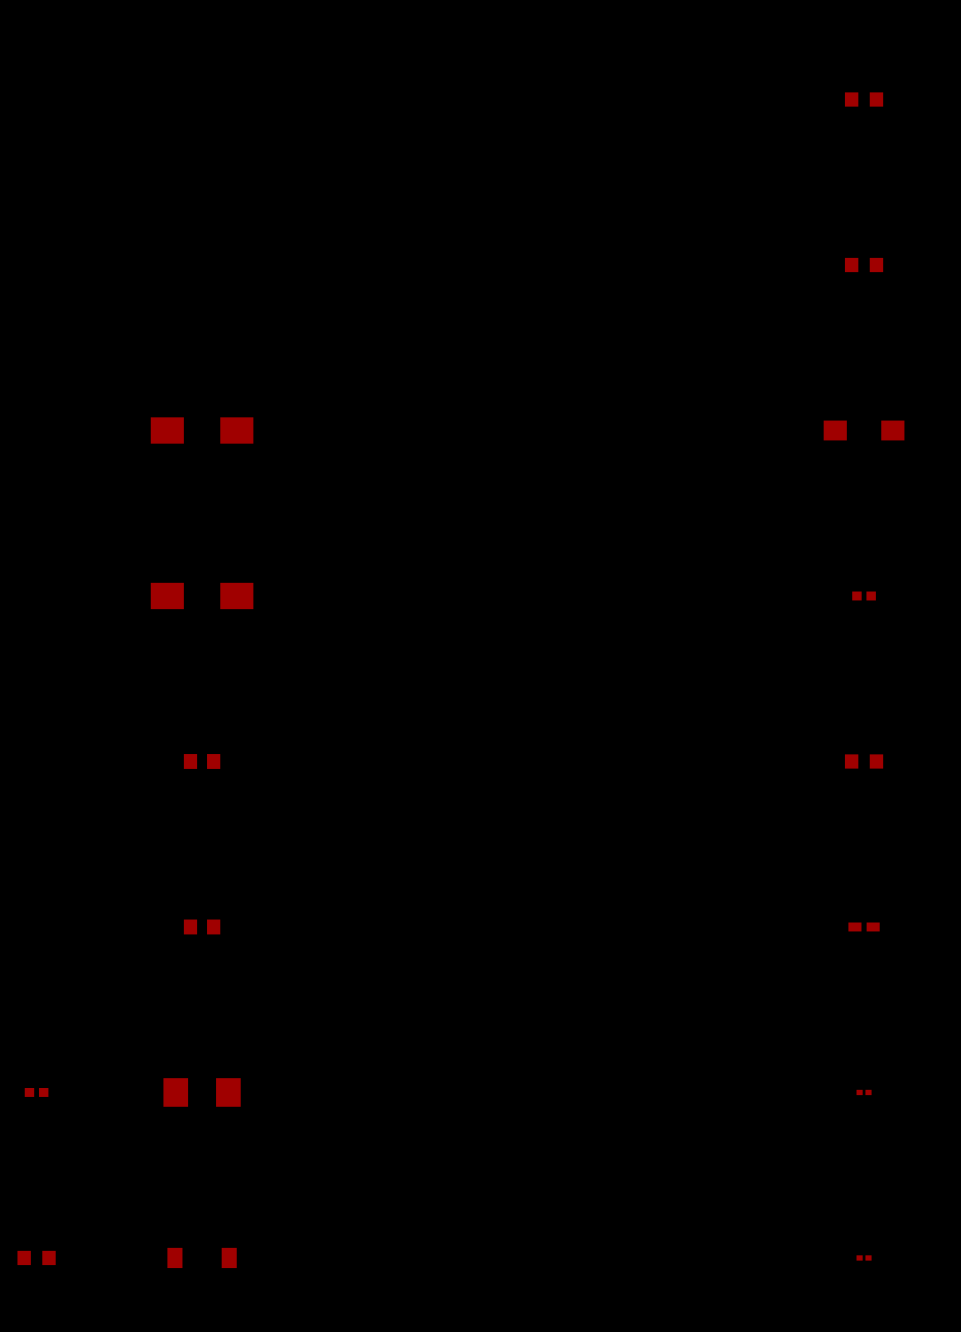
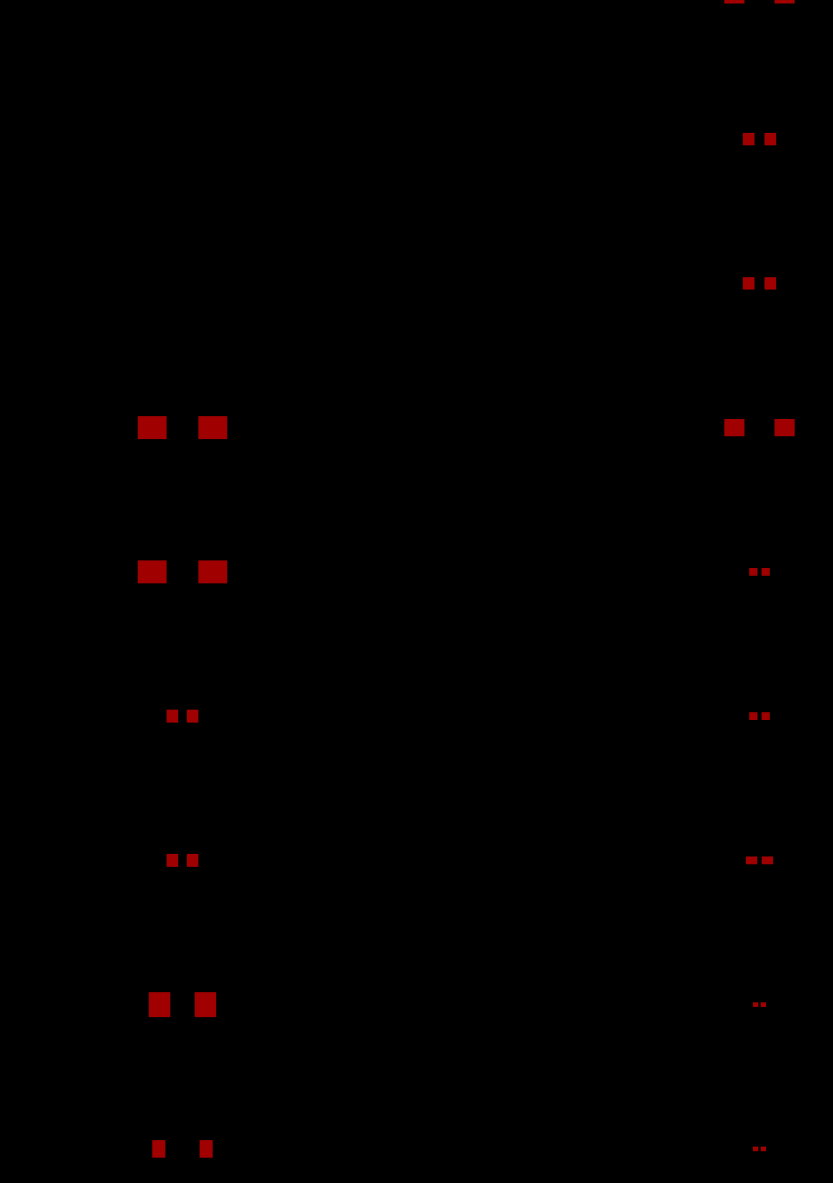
part footprint: [844, 754, 884, 769] -> [749, 712, 770, 721]
part: (36, 1092) -> none
part: (36, 1257) -> none

